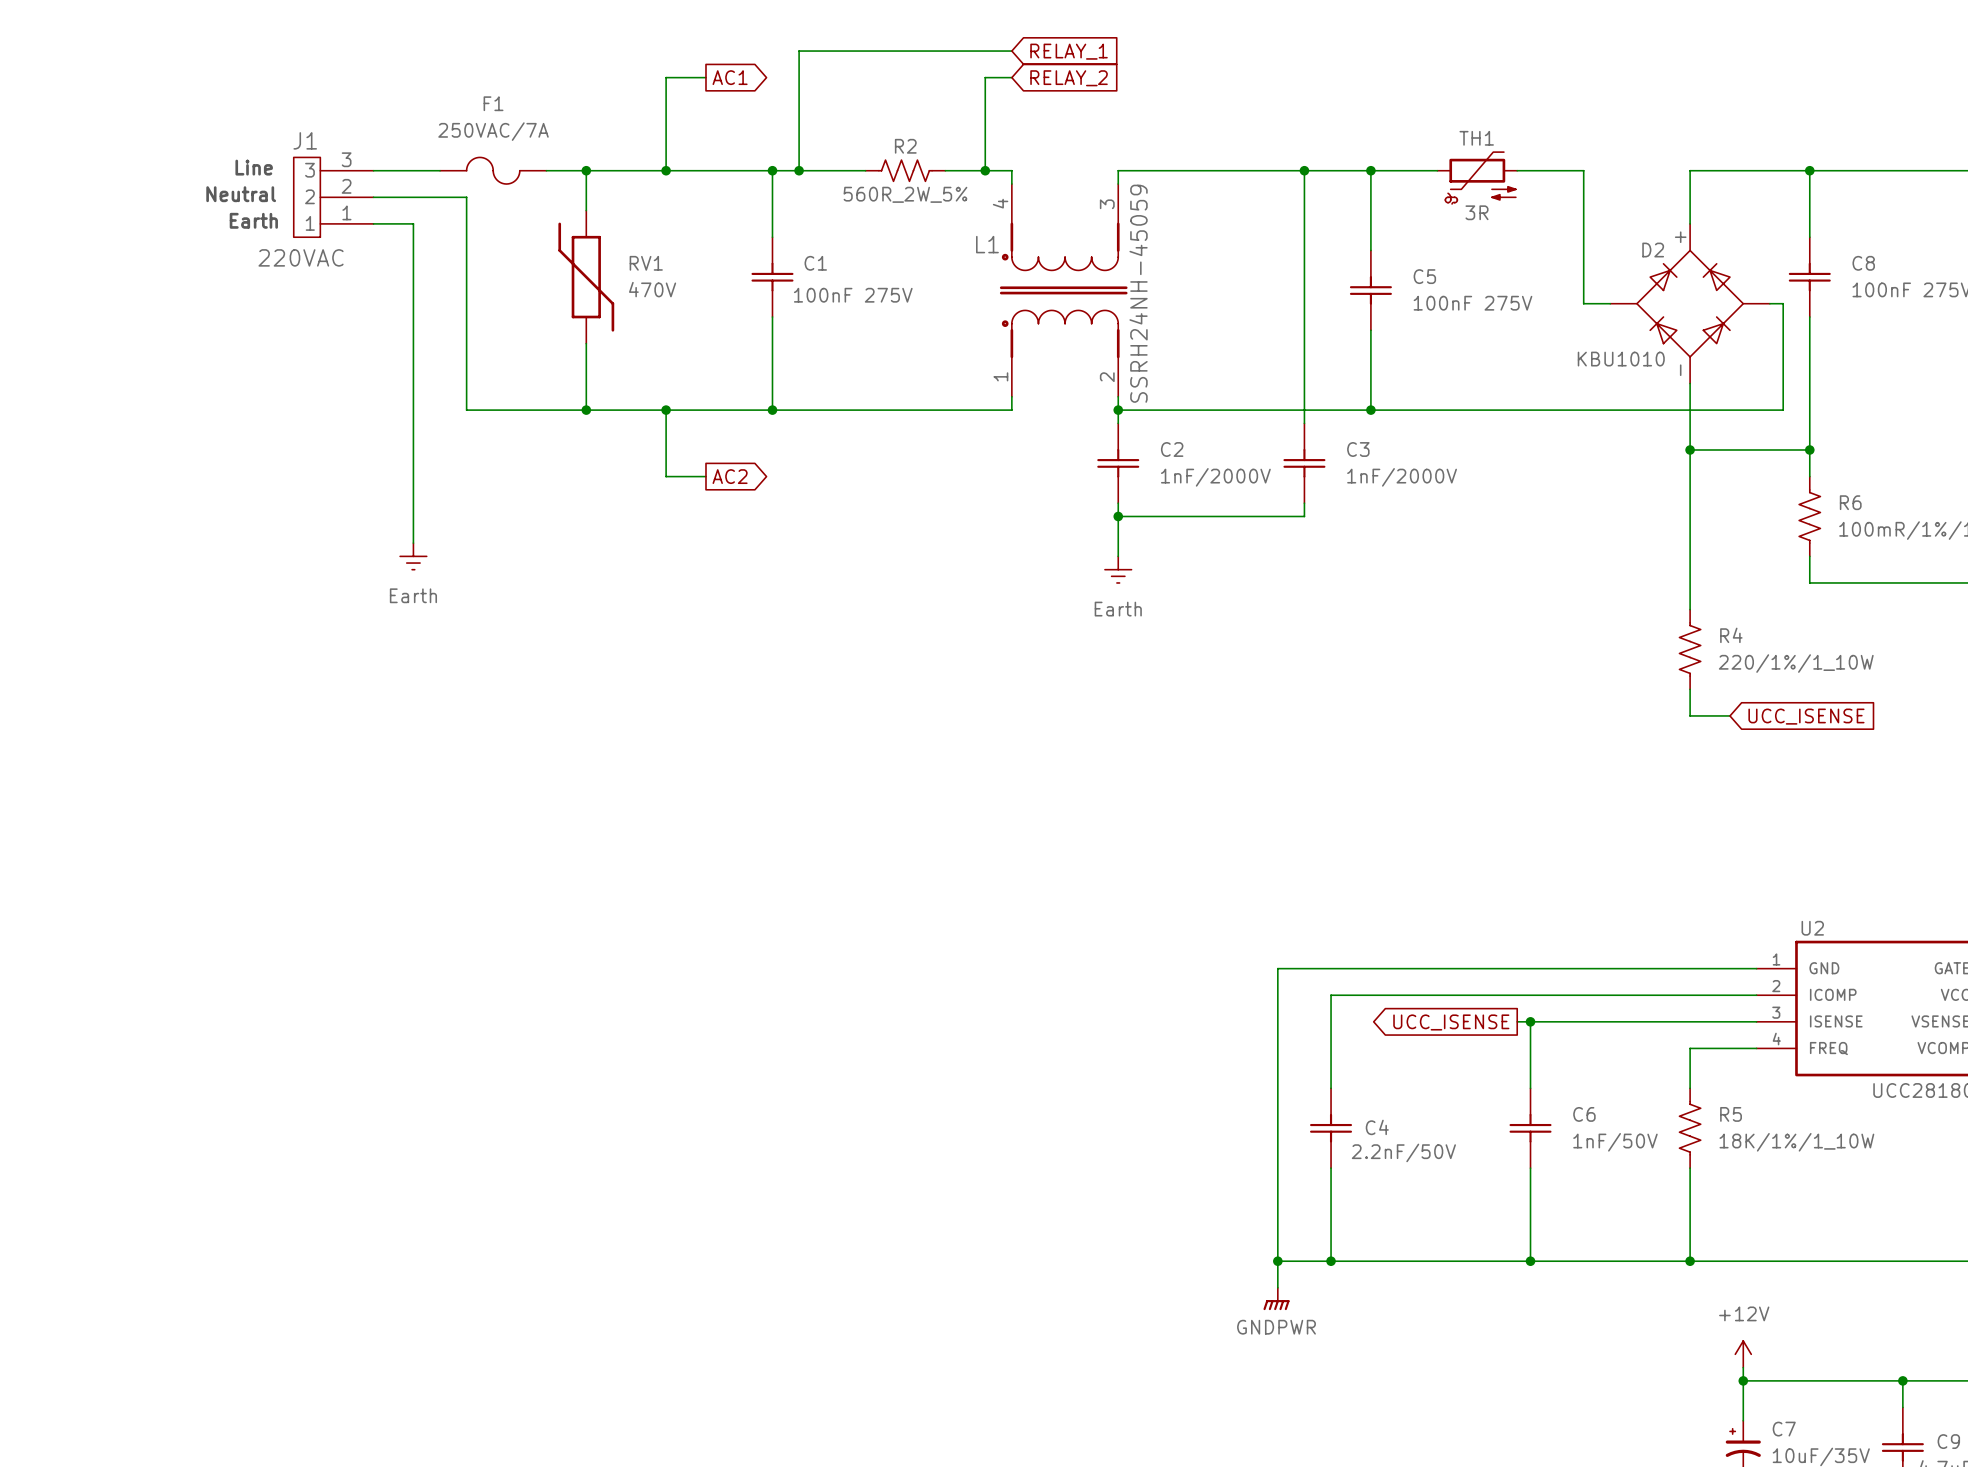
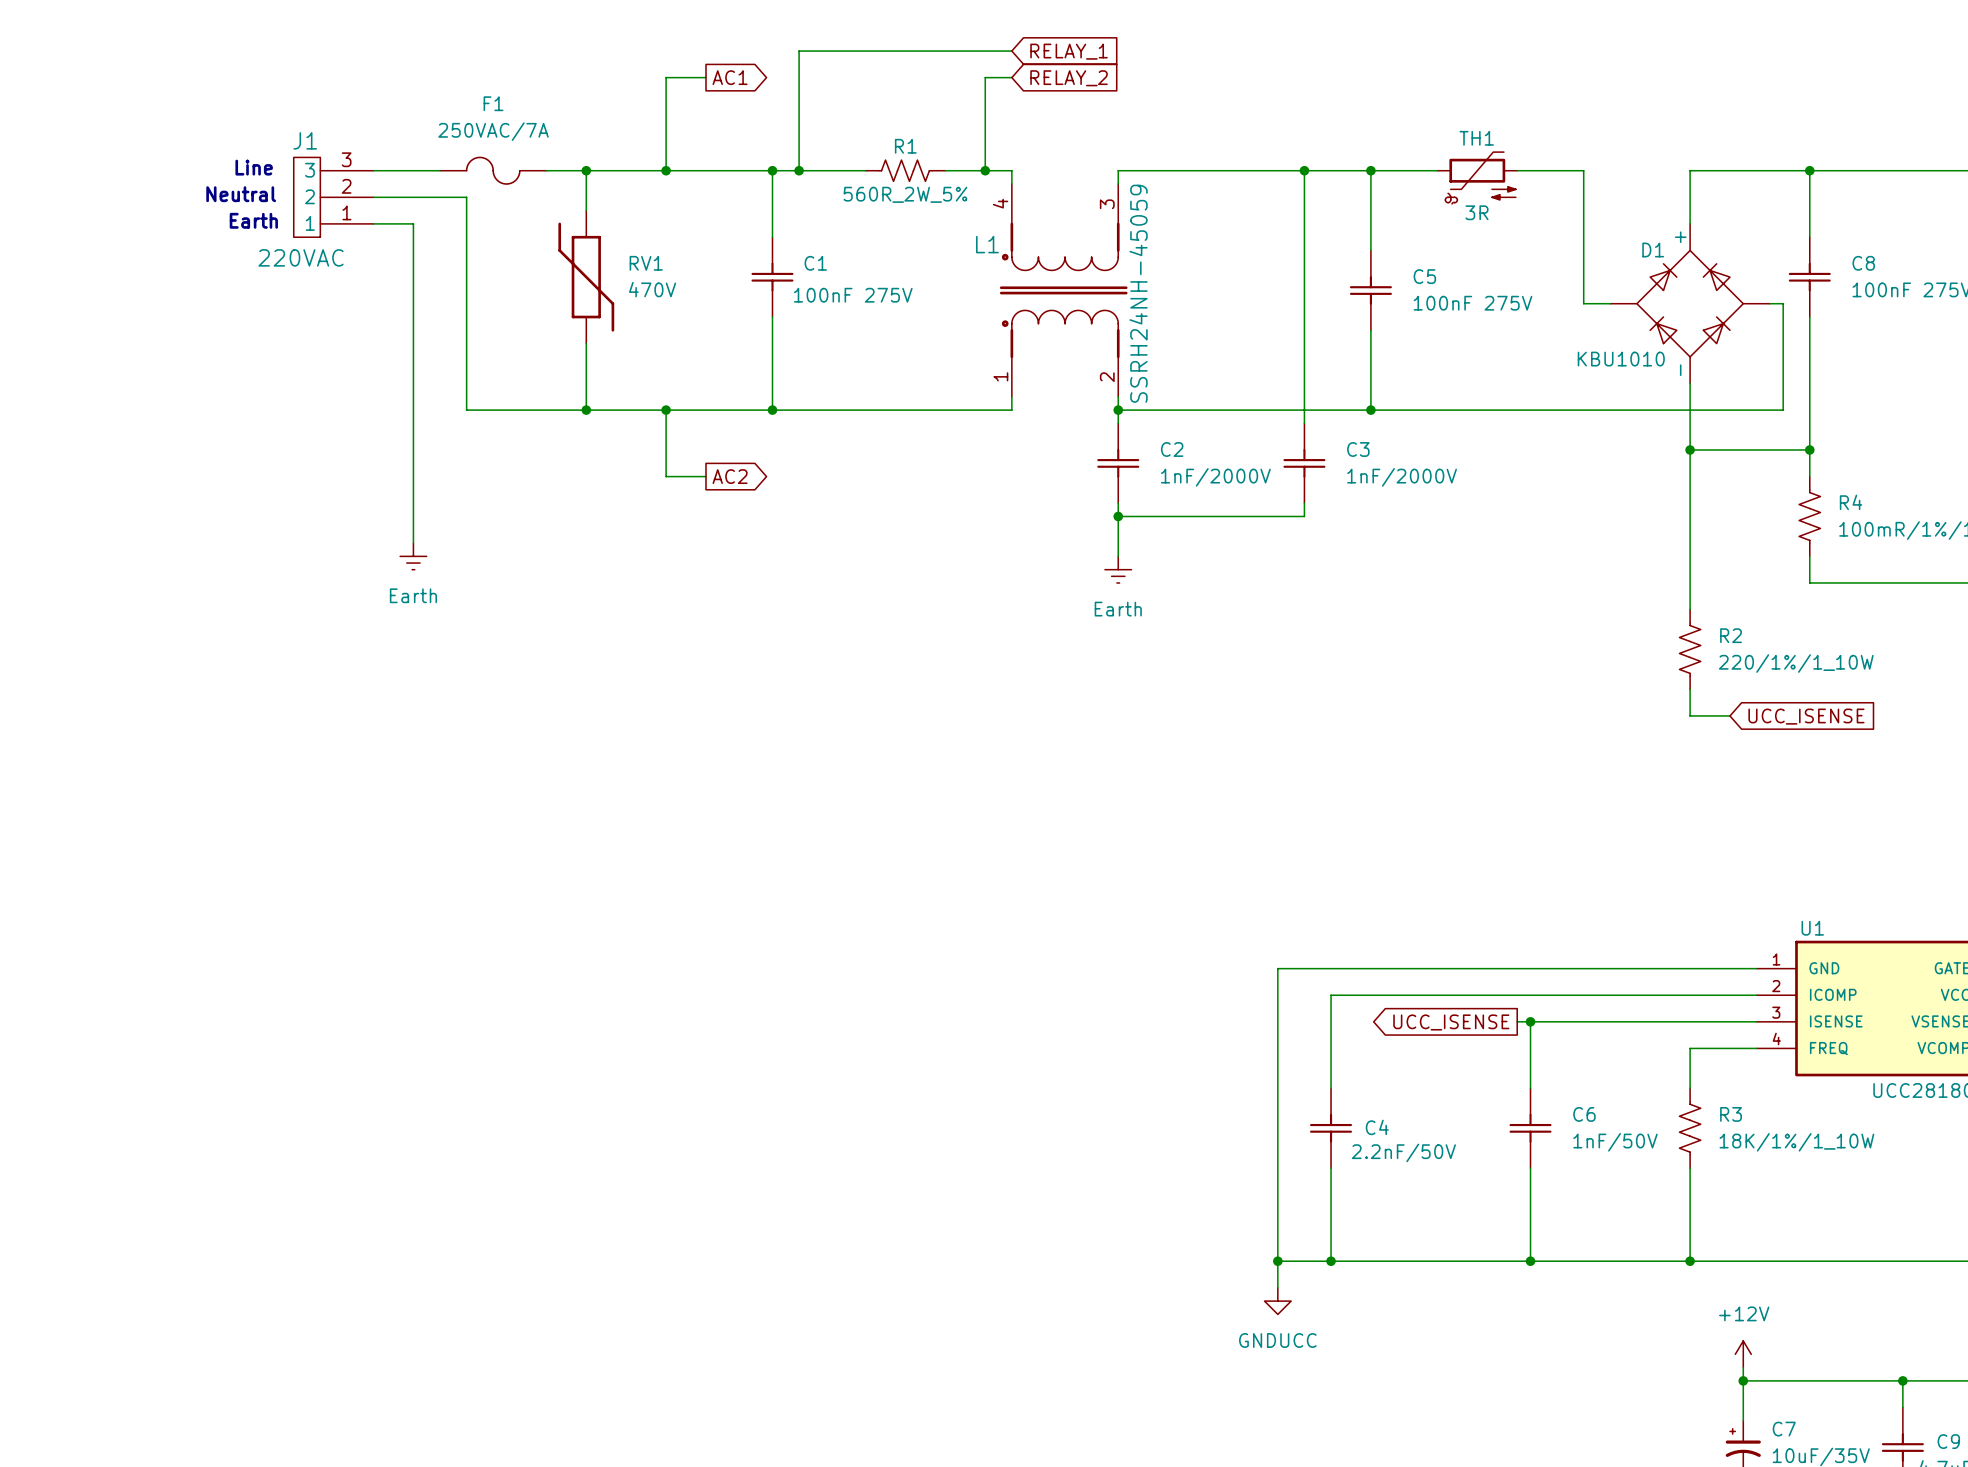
R2 name: R2 (905, 146) -> R1 (905, 146)
D2 name: D2 (1653, 250) -> D1 (1653, 250)
R6 name: R6 (1850, 502) -> R4 (1851, 502)
R4 name: R4 (1731, 635) -> R2 (1731, 635)
U2 name: U2 (1812, 928) -> U1 (1812, 928)
R5 name: R5 (1731, 1114) -> R3 (1731, 1114)
power symbol: GNDPWR (1276, 1298) -> GNDUCC (1277, 1301)

